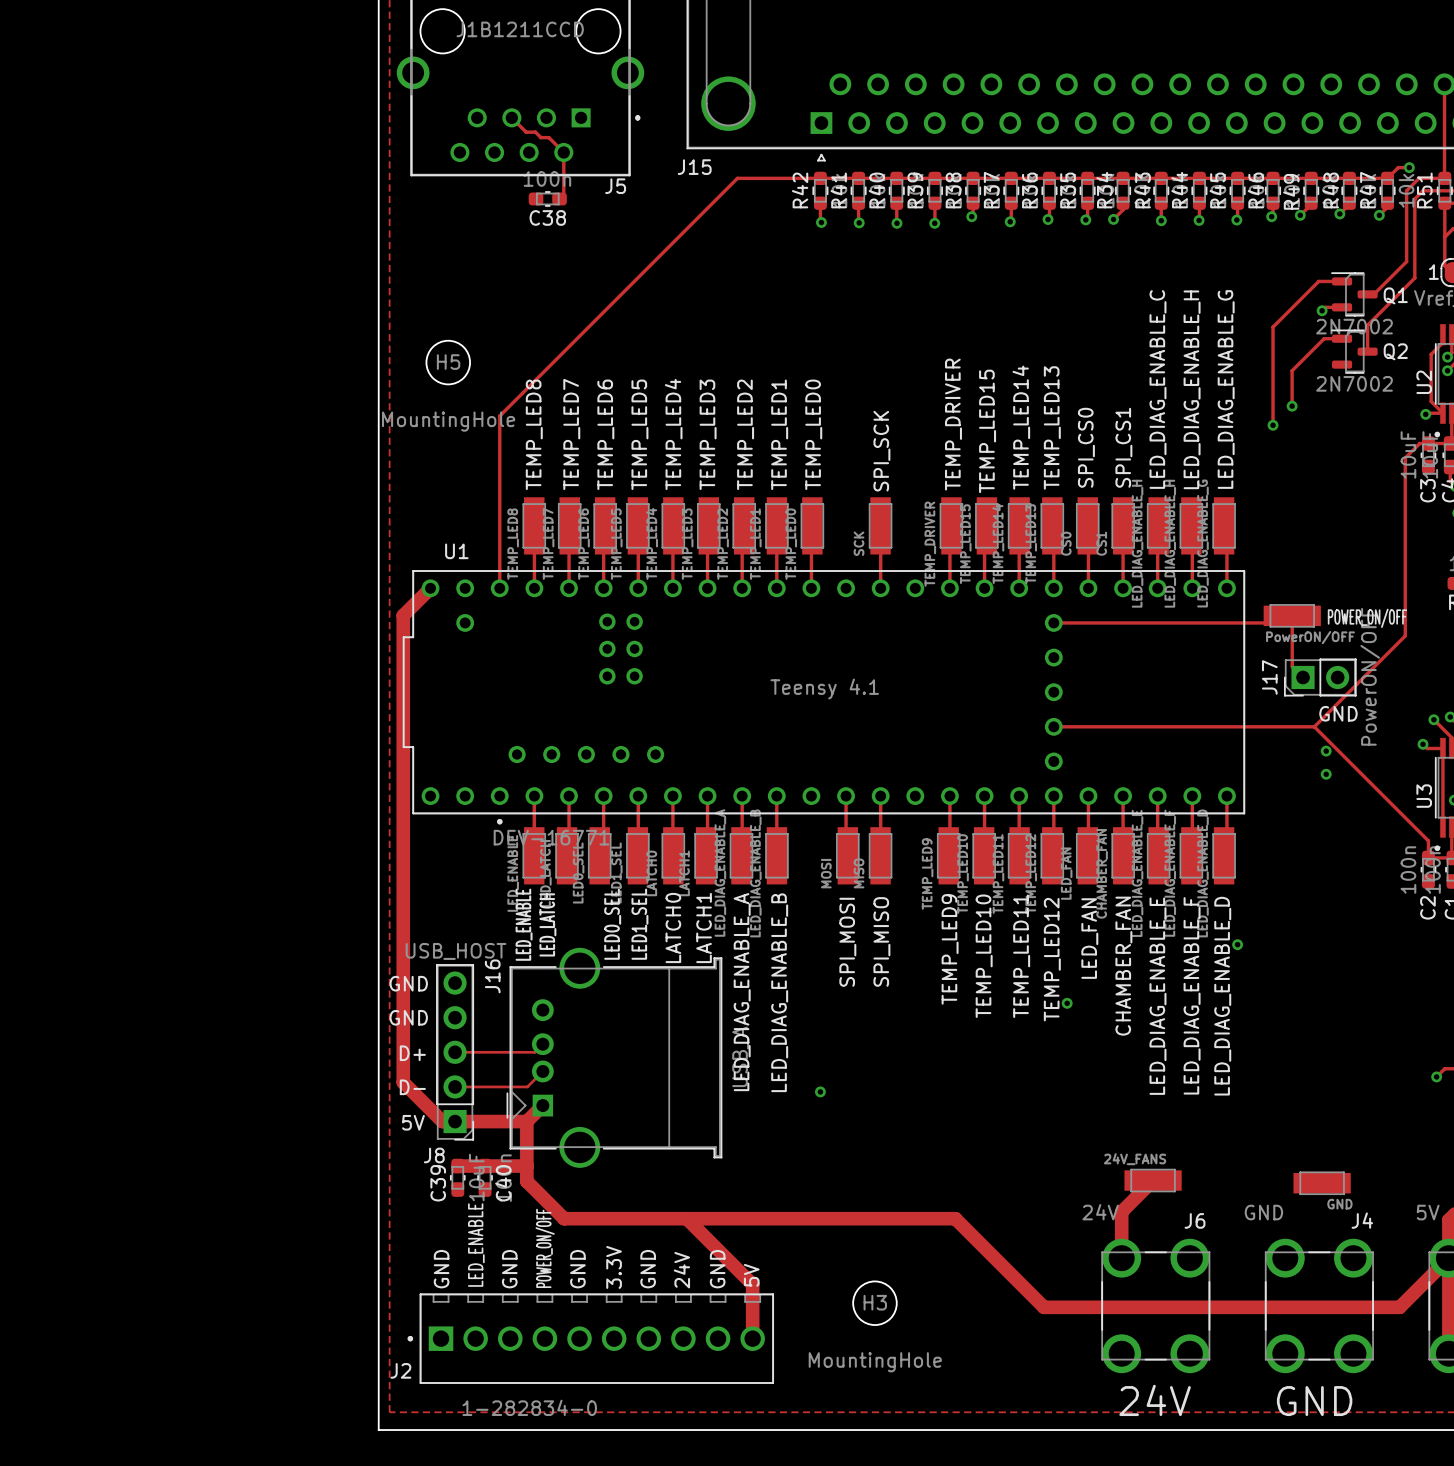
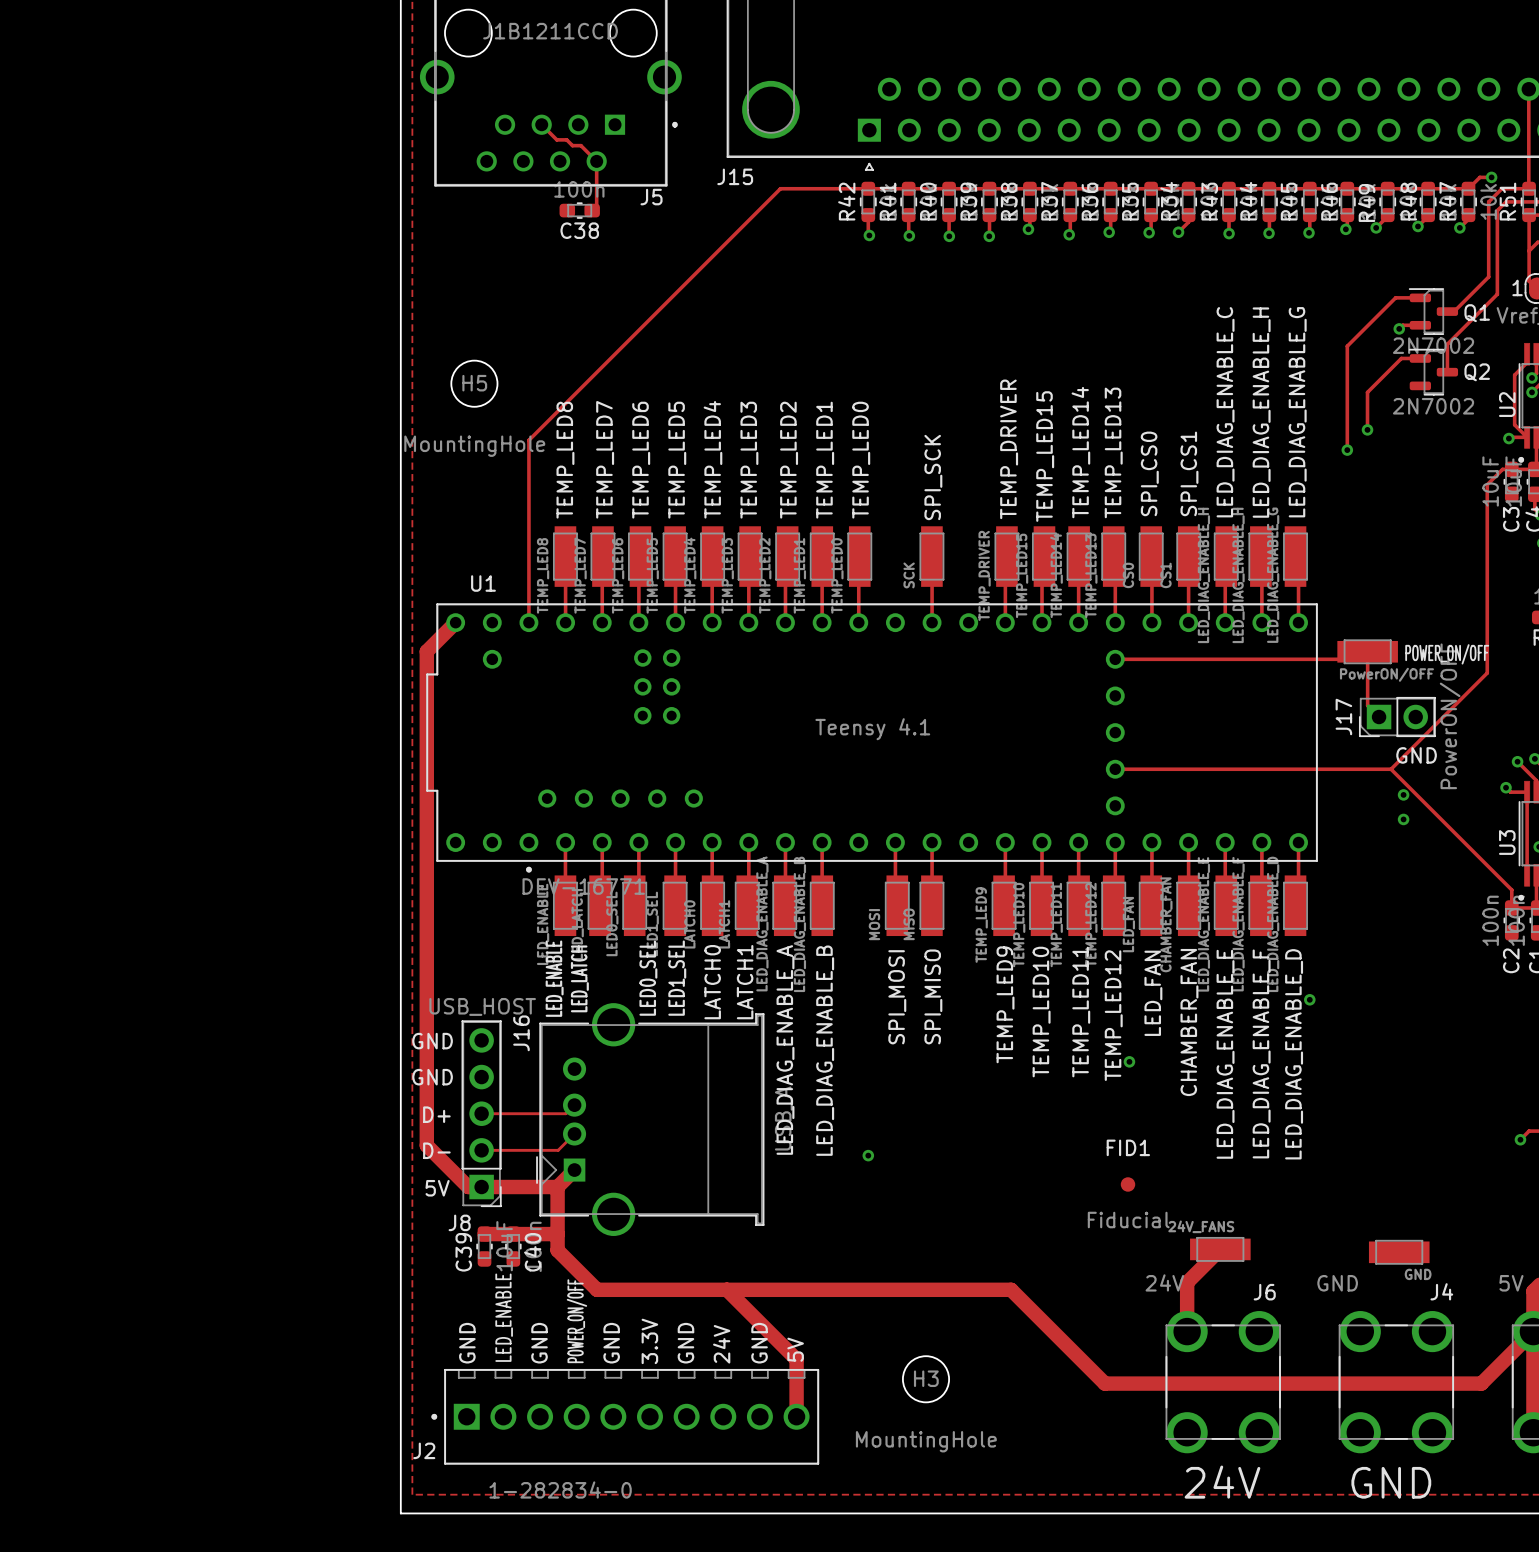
FID1: none -> Fiducial (1128, 1184)

